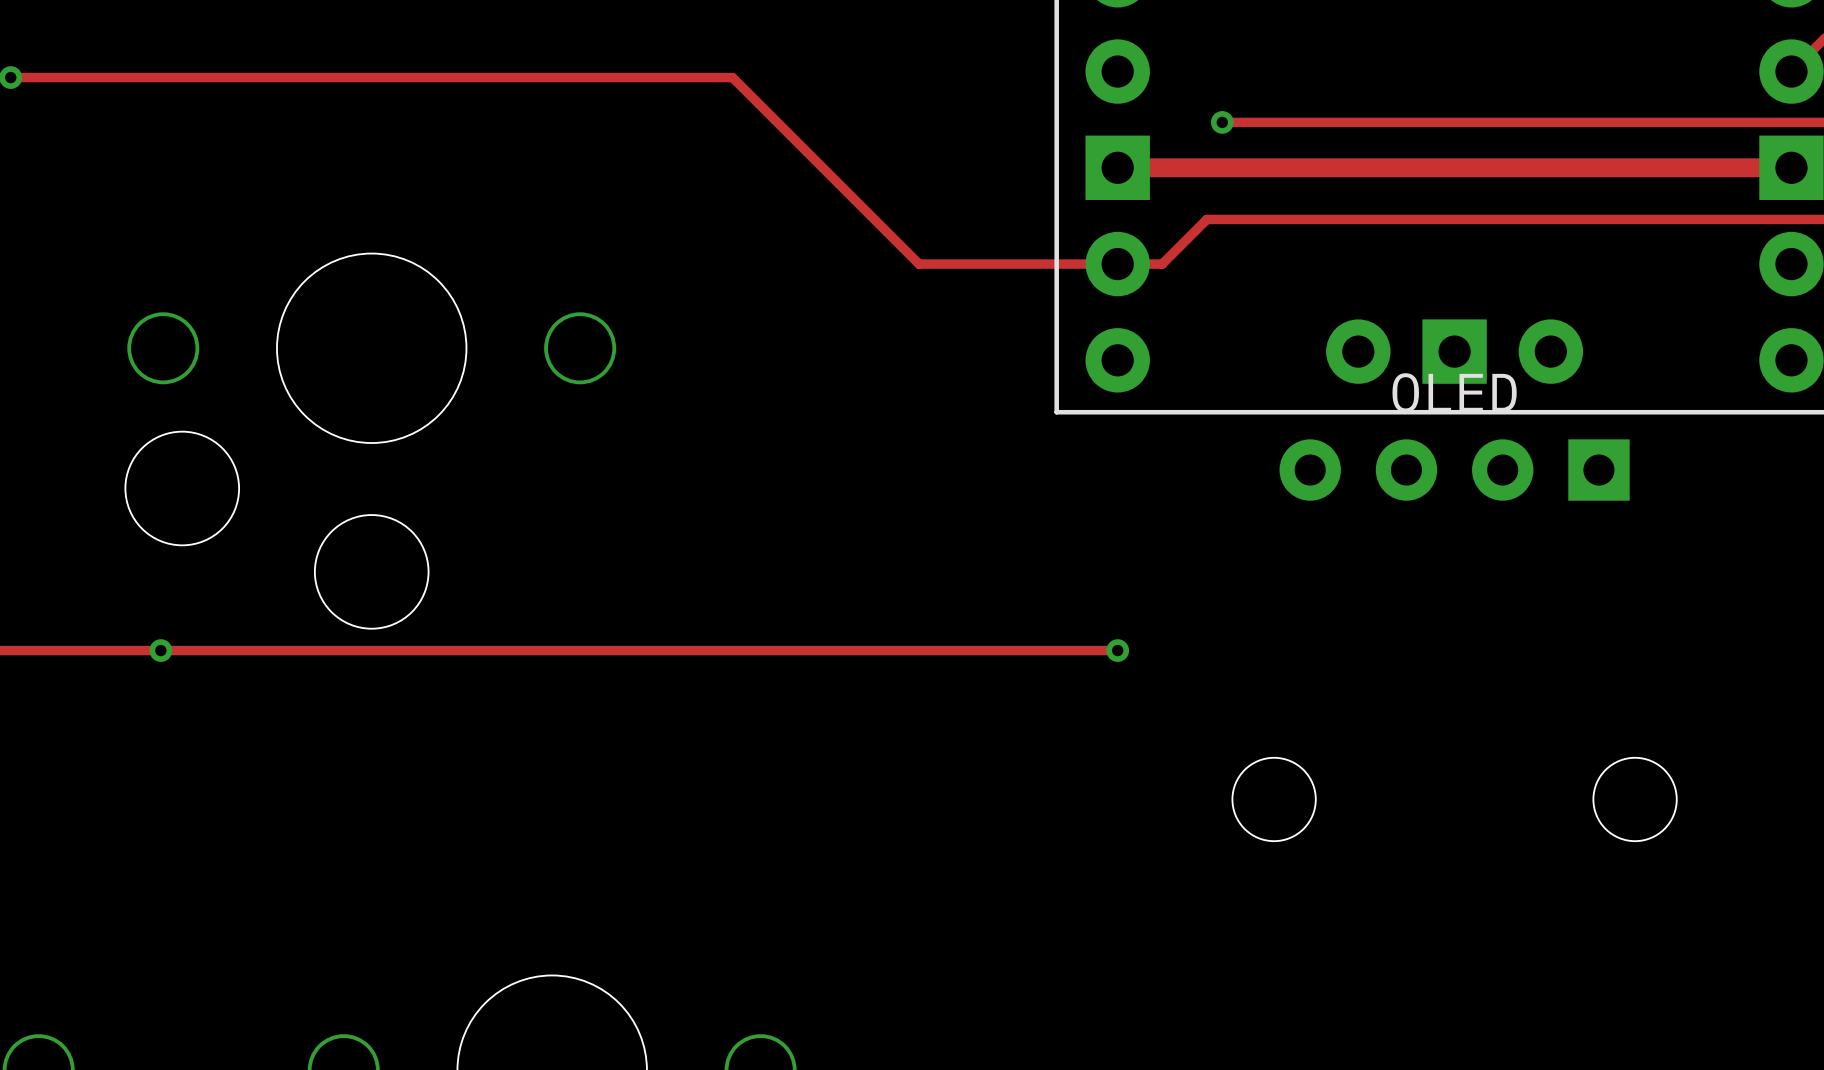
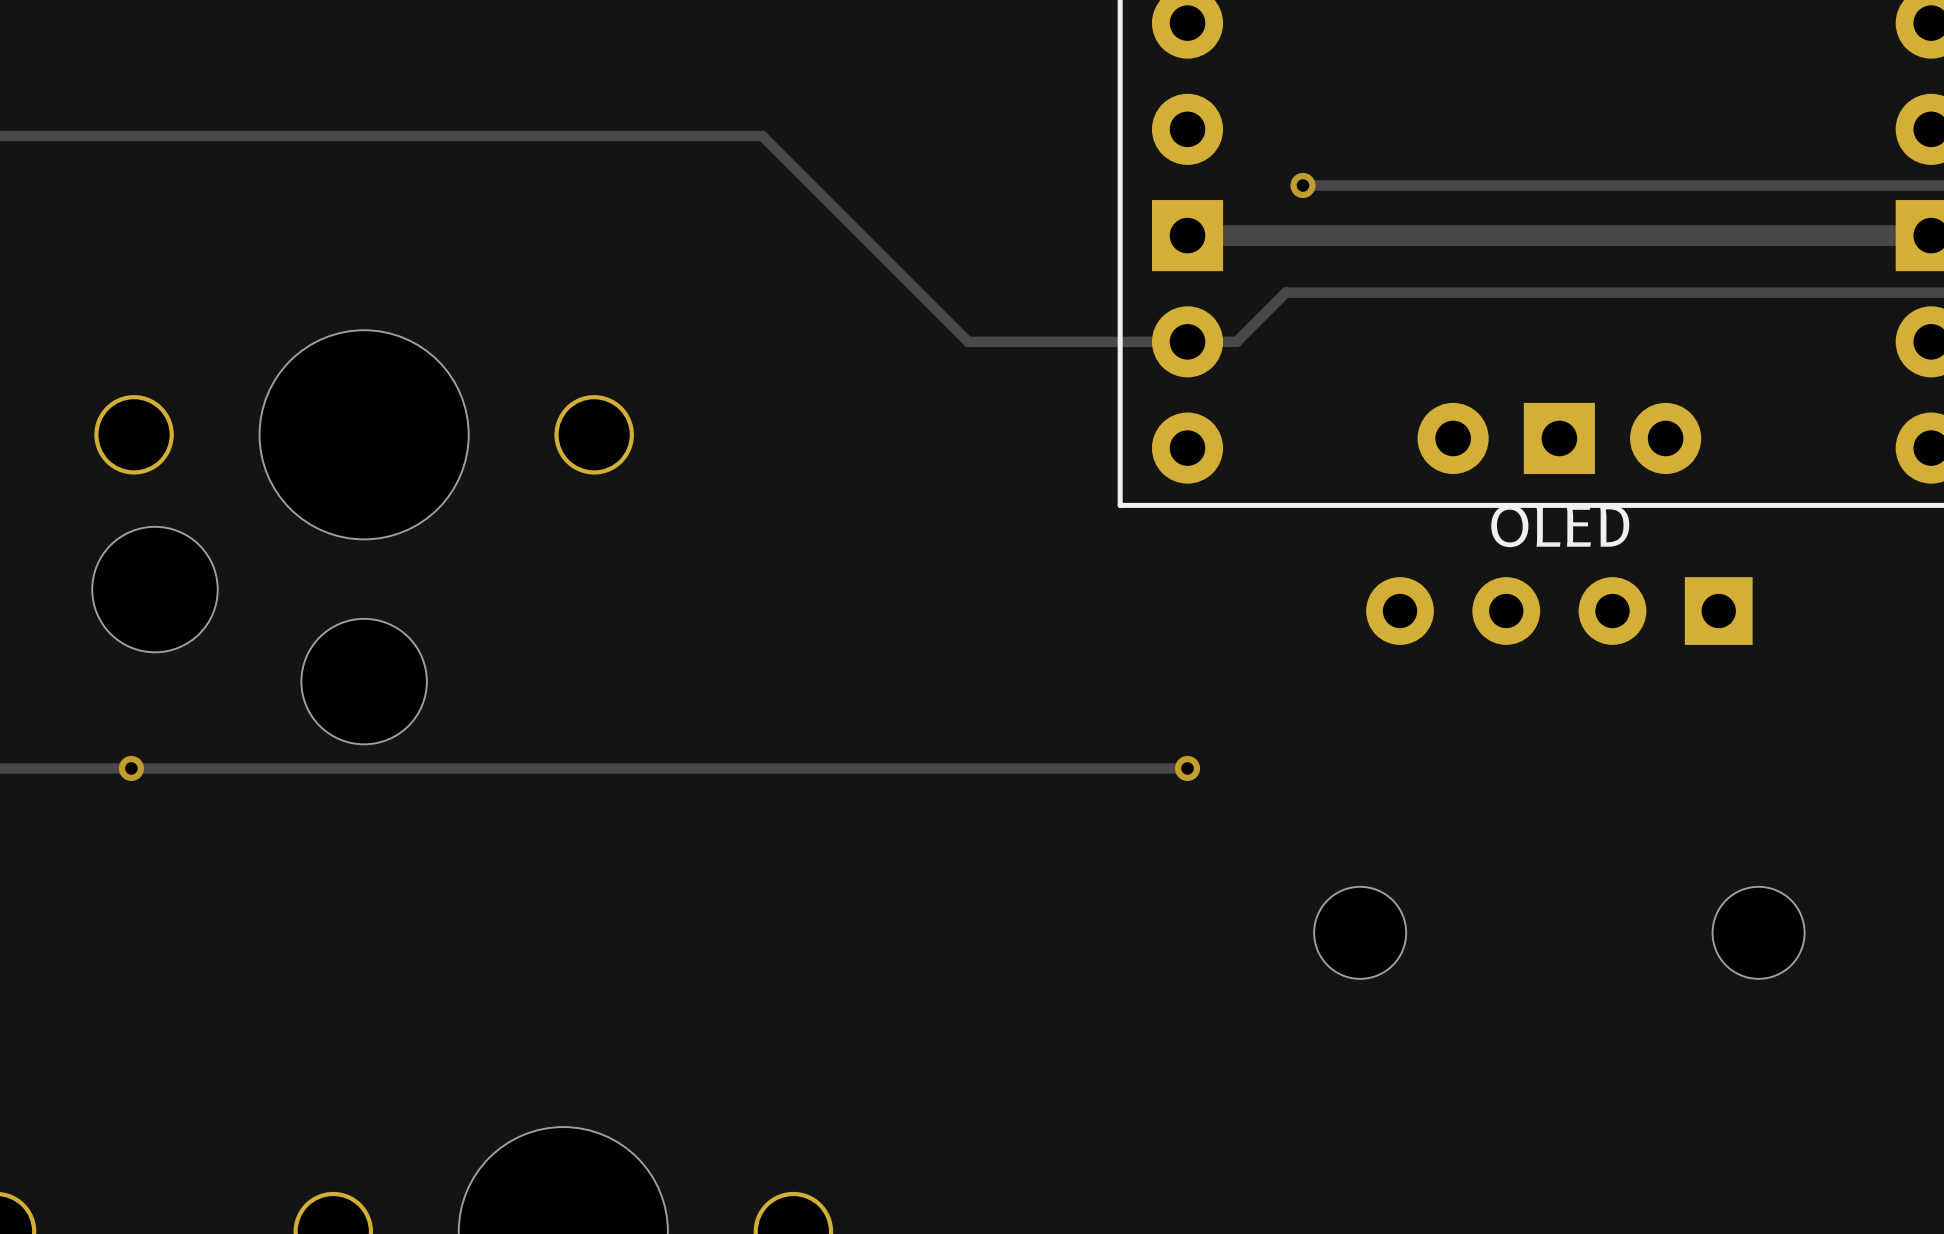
part position: (1454, 470) -> (1559, 611)

